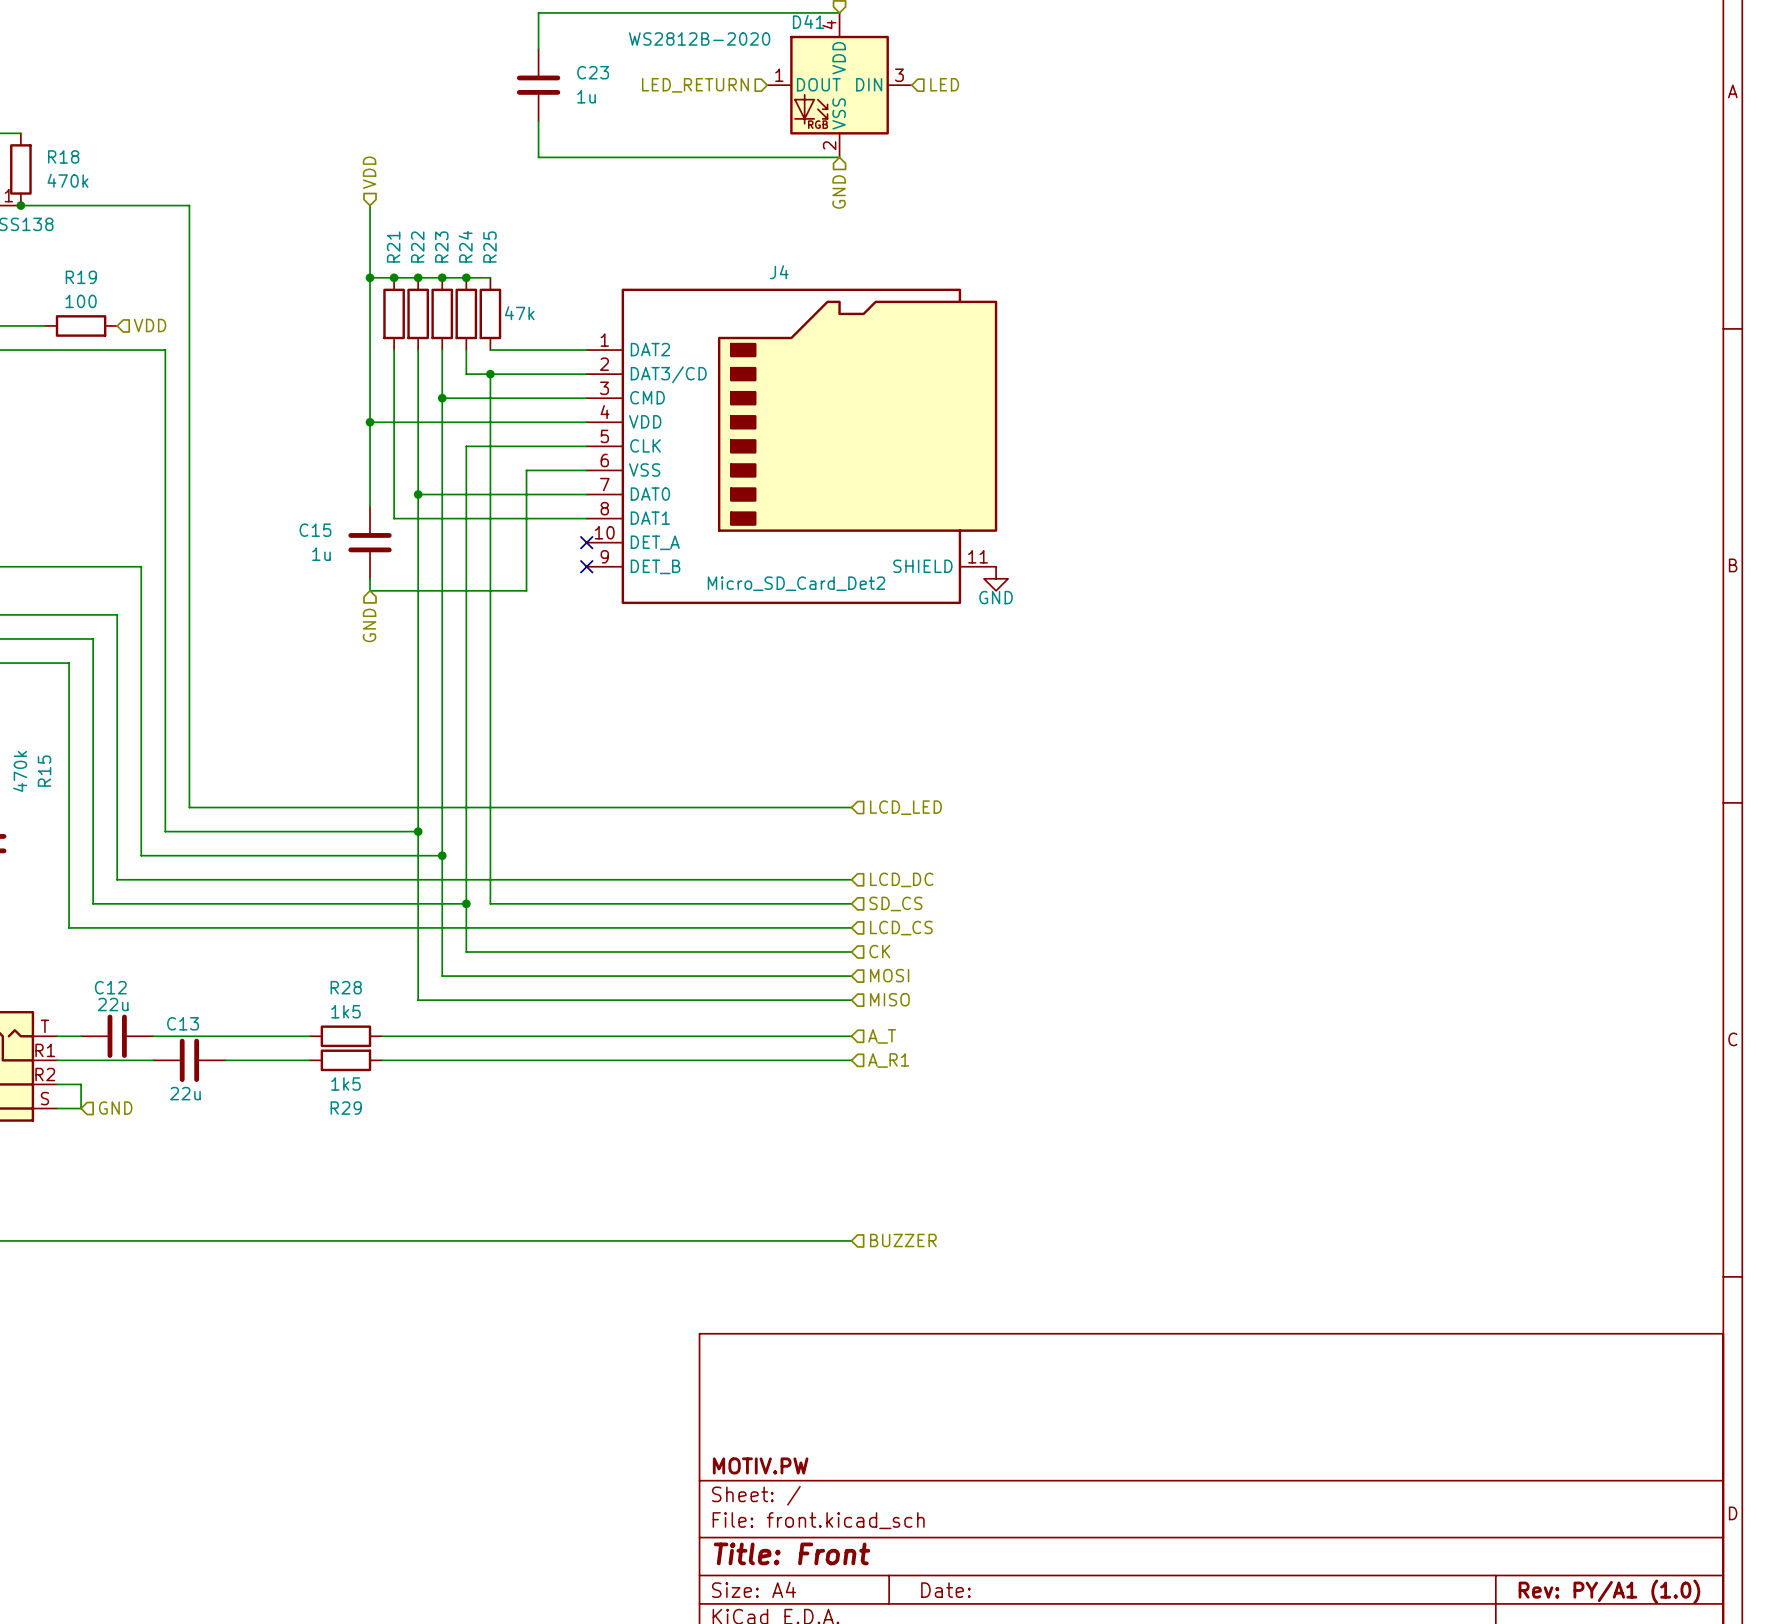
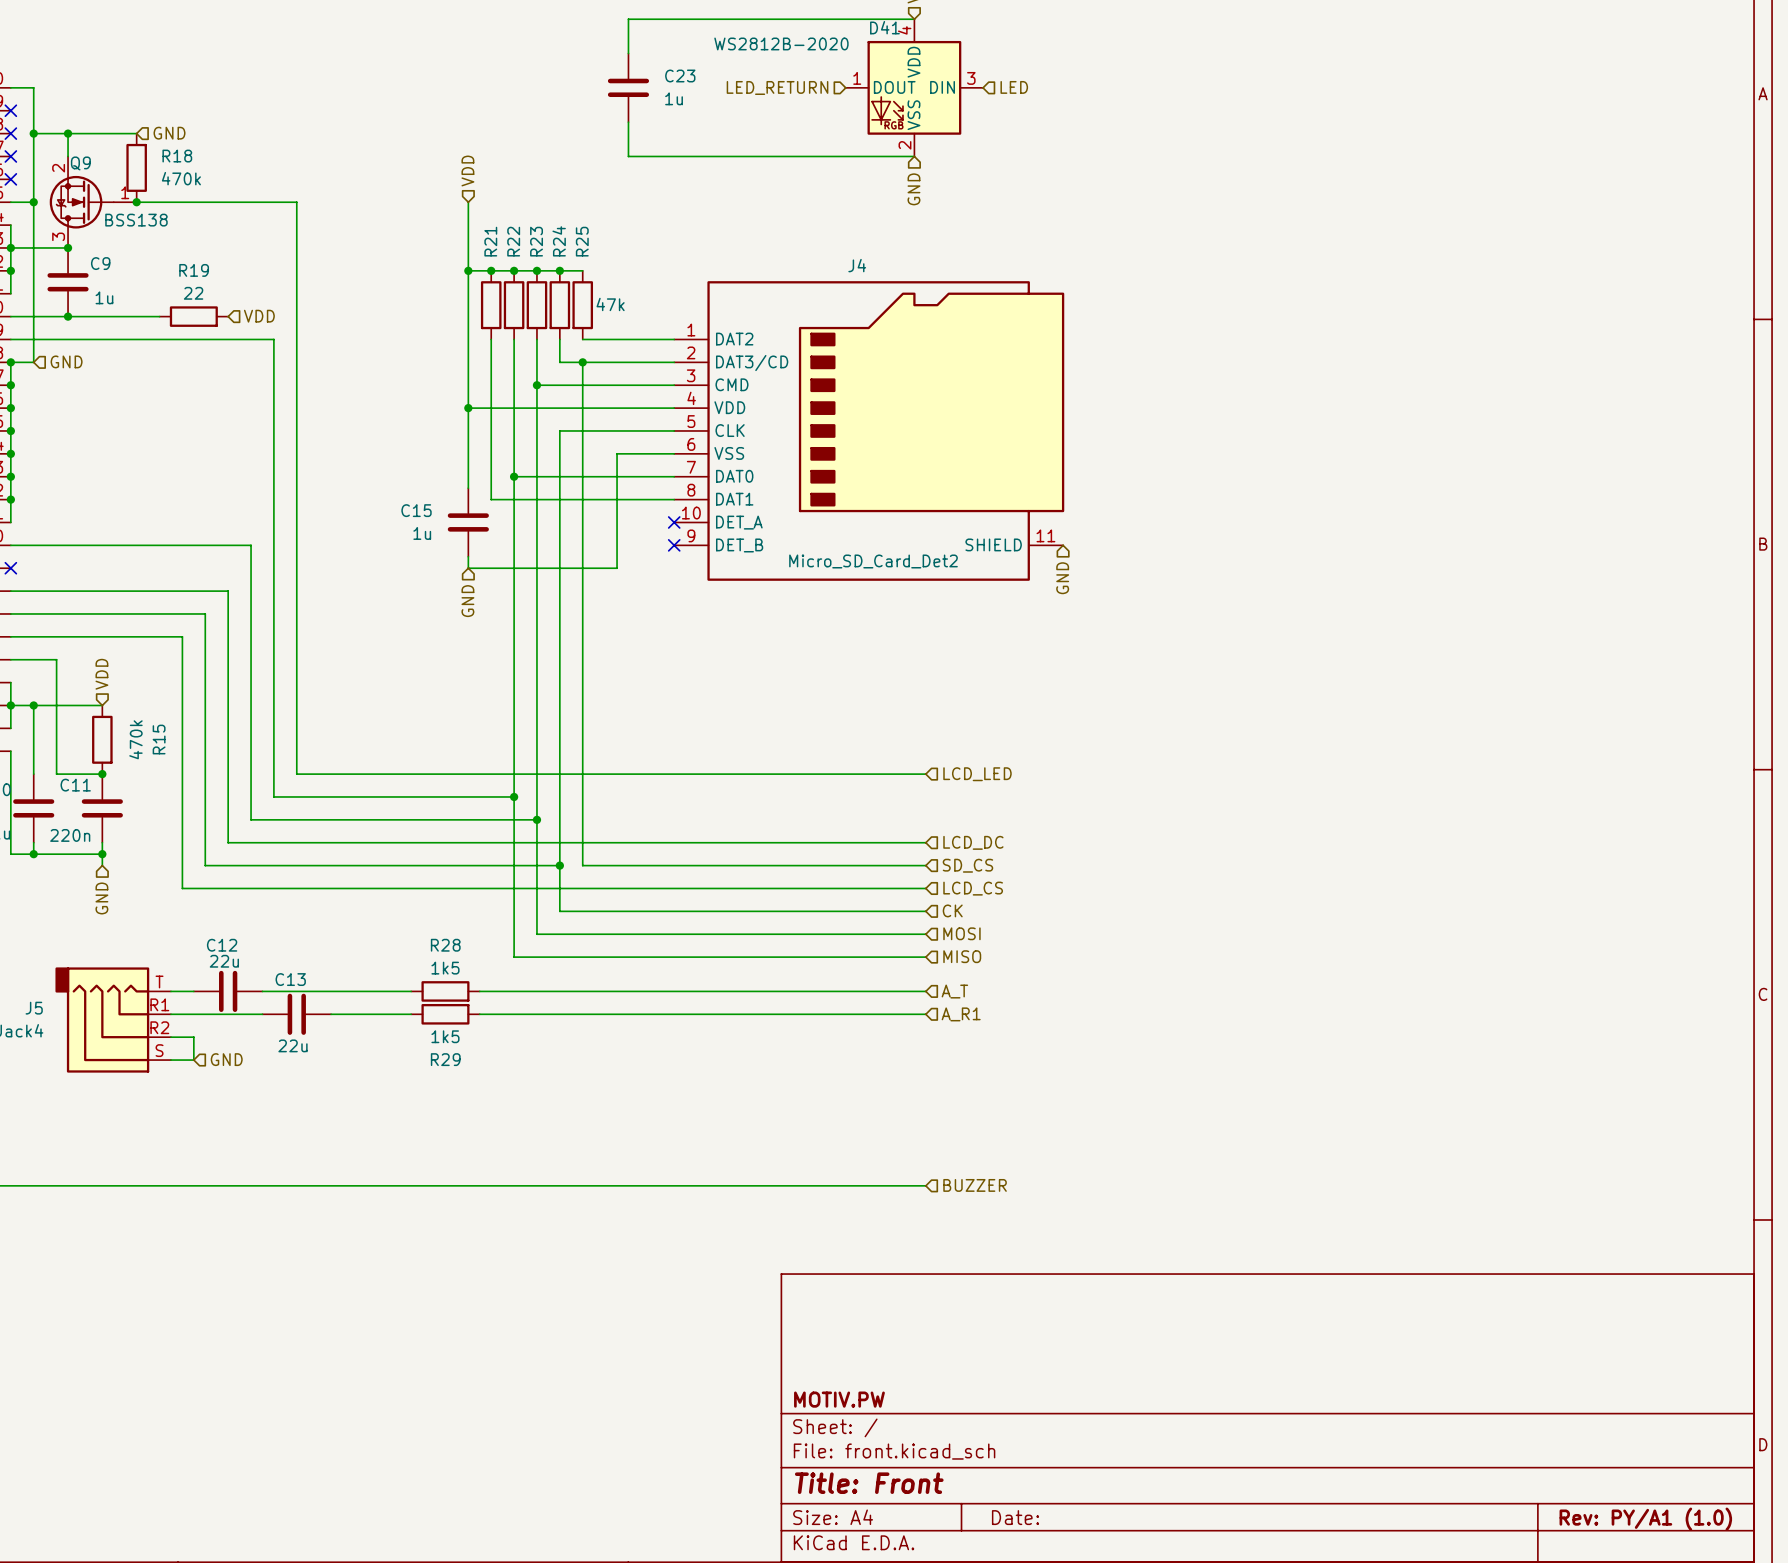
hierarchical label: none -> GND (169, 133)
R19 value: 100 (81, 301) -> 22 (193, 293)
power symbol: GND (996, 578) -> none
hierarchical label: none -> GND (1062, 578)

